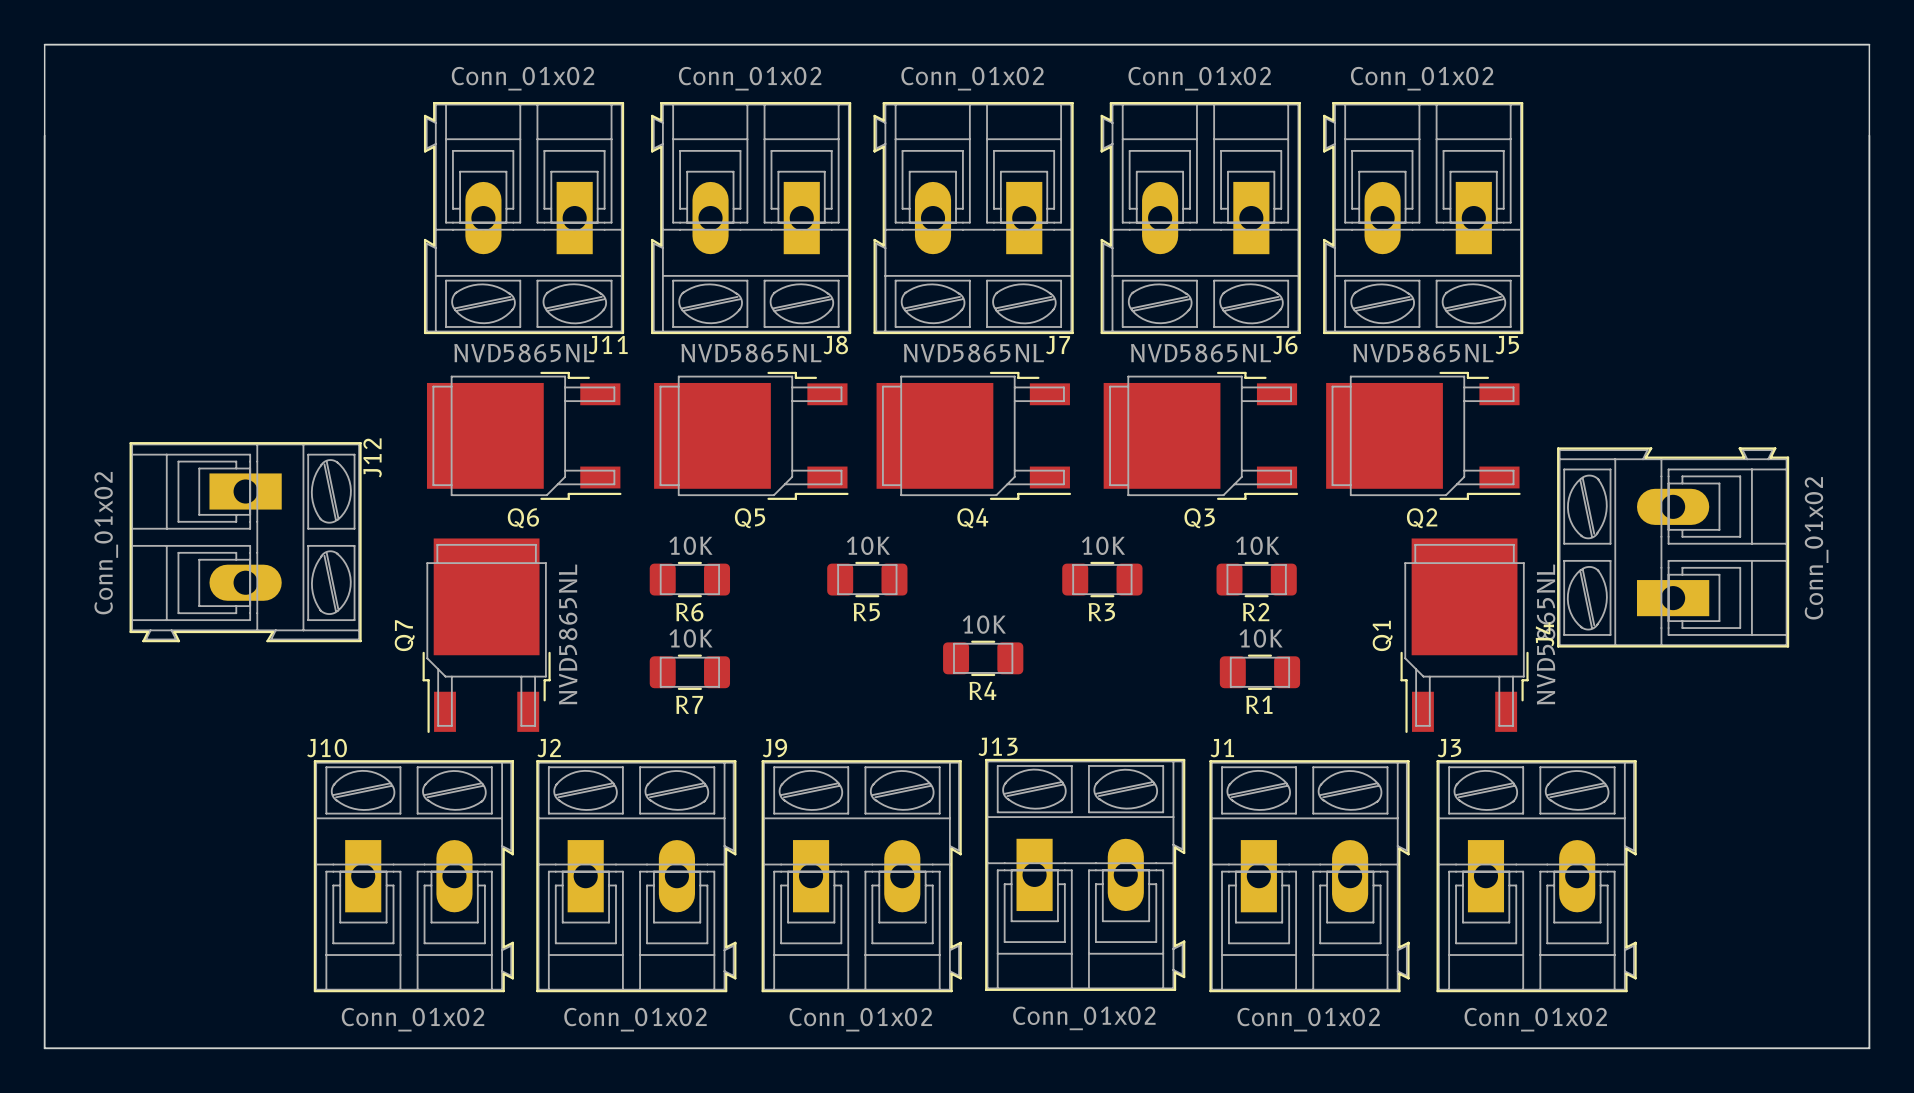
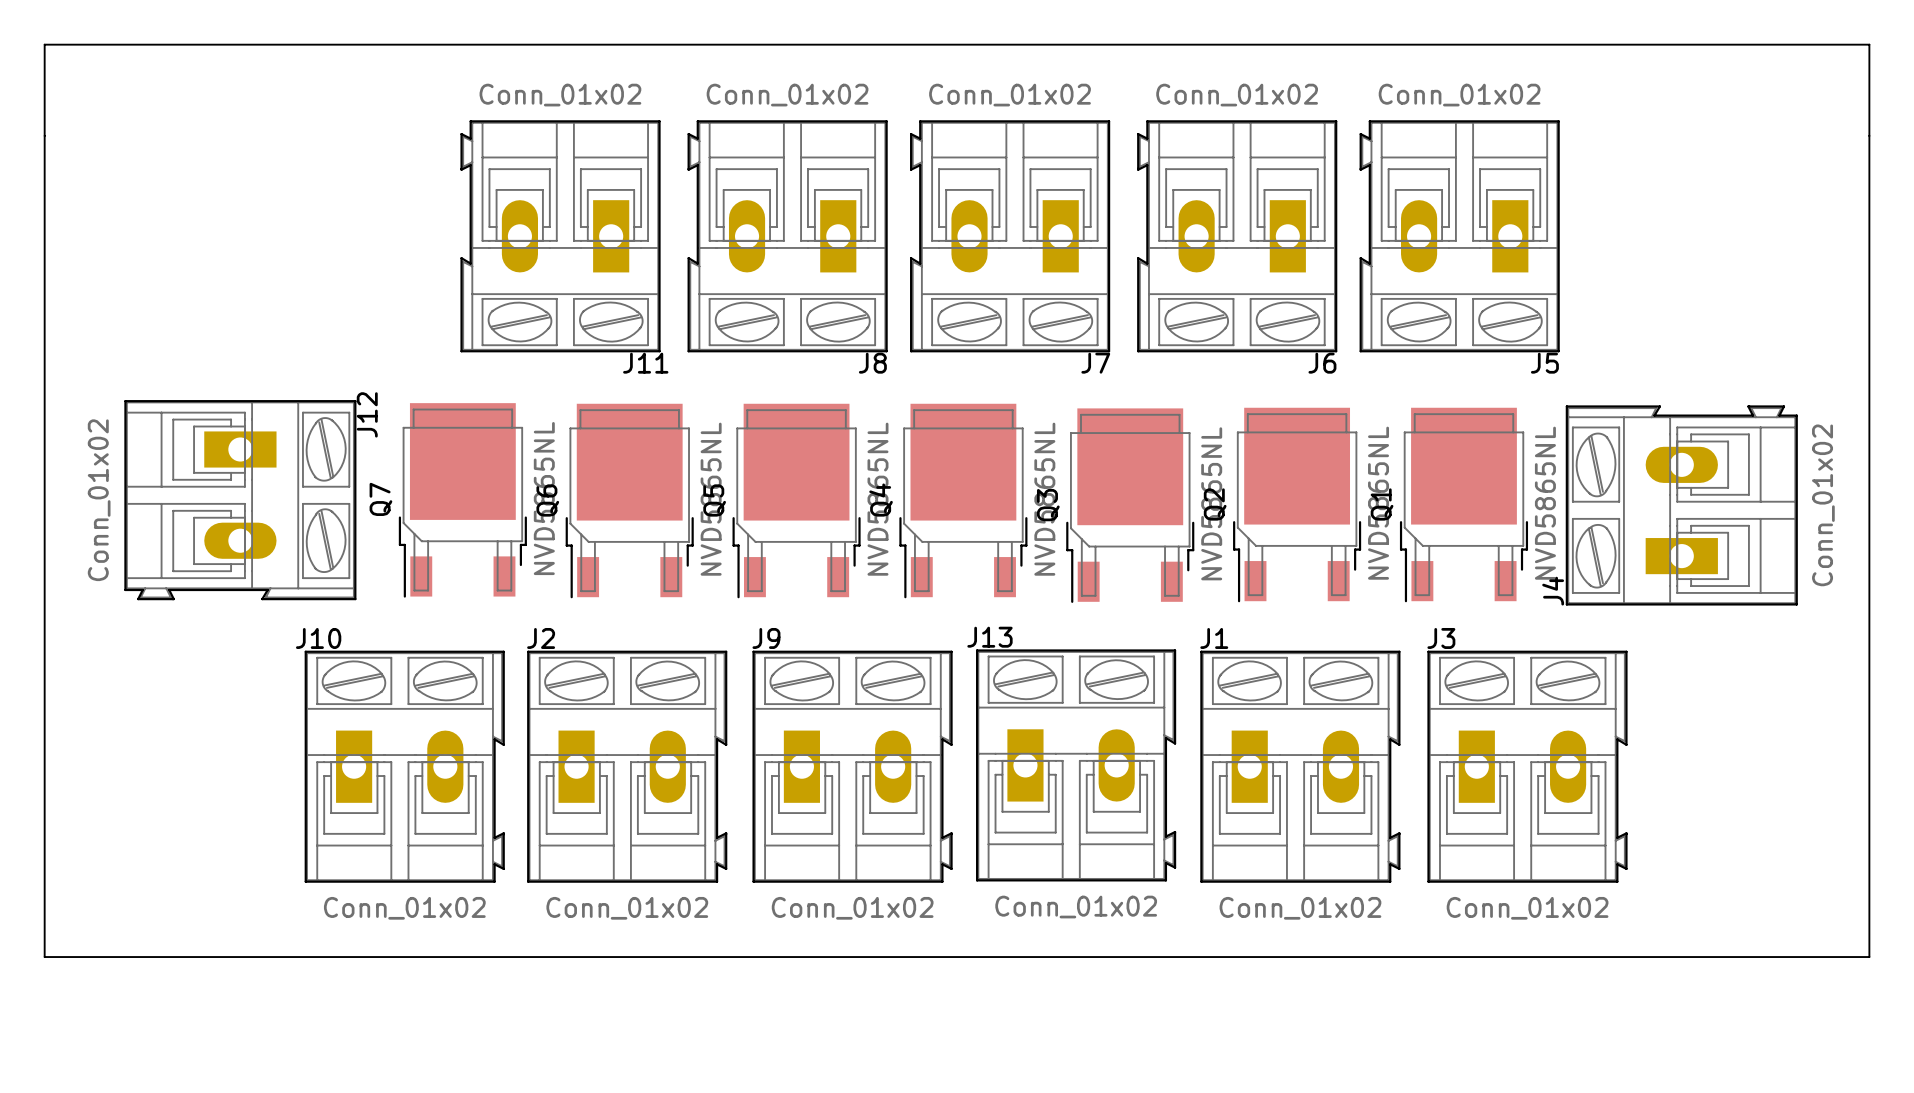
J11 position: (524, 218) -> (560, 236)
J8 position: (751, 218) -> (787, 236)
J7 position: (973, 218) -> (1010, 236)
J6 position: (1200, 218) -> (1237, 236)
J5 position: (1423, 218) -> (1459, 236)
Q6 rotation: 0° (524, 435) -> 90° clockwise (629, 501)
Q6 position: (524, 435) -> (629, 501)
Q5 rotation: 0° (751, 435) -> 90° clockwise (796, 501)
Q4 rotation: 0° (973, 435) -> 90° clockwise (963, 501)
Q3 rotation: 0° (1200, 435) -> 90° clockwise (1130, 505)
Q2 rotation: 0° (1423, 435) -> 90° clockwise (1297, 505)
Q2 position: (1423, 435) -> (1297, 505)
J12 position: (245, 542) -> (240, 500)
J4 position: (1673, 547) -> (1681, 505)
R6: 10K (689, 579) -> none
R5: 10K (867, 579) -> none
R3: 10K (1102, 579) -> none
R2: 10K (1256, 579) -> none
Q7 position: (486, 635) -> (462, 500)
Q1 position: (1464, 635) -> (1463, 505)
R4: 10K (983, 658) -> none
R7: 10K (689, 672) -> none
R1: 10K (1259, 672) -> none
J13 position: (1085, 874) -> (1076, 765)
J10 position: (413, 876) -> (404, 766)
J2 position: (636, 876) -> (627, 766)
J9 position: (861, 876) -> (852, 766)
J1 position: (1309, 876) -> (1300, 766)
J3 position: (1536, 876) -> (1527, 766)
board edge: (44, 957) (44, 1048) (1869, 1048) (1869, 957) -> (44, 957) (1869, 957)

